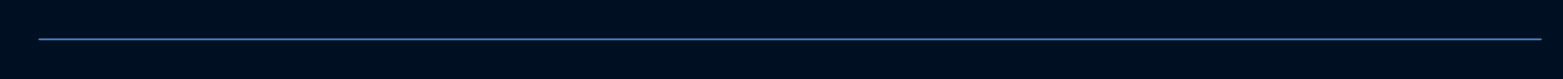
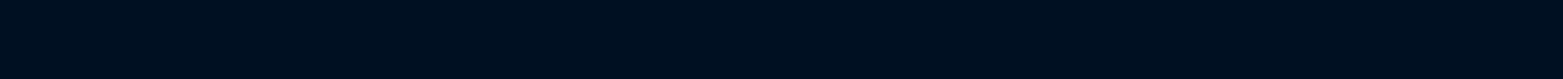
bottom track: (1540, 39) (39, 39) -> none

